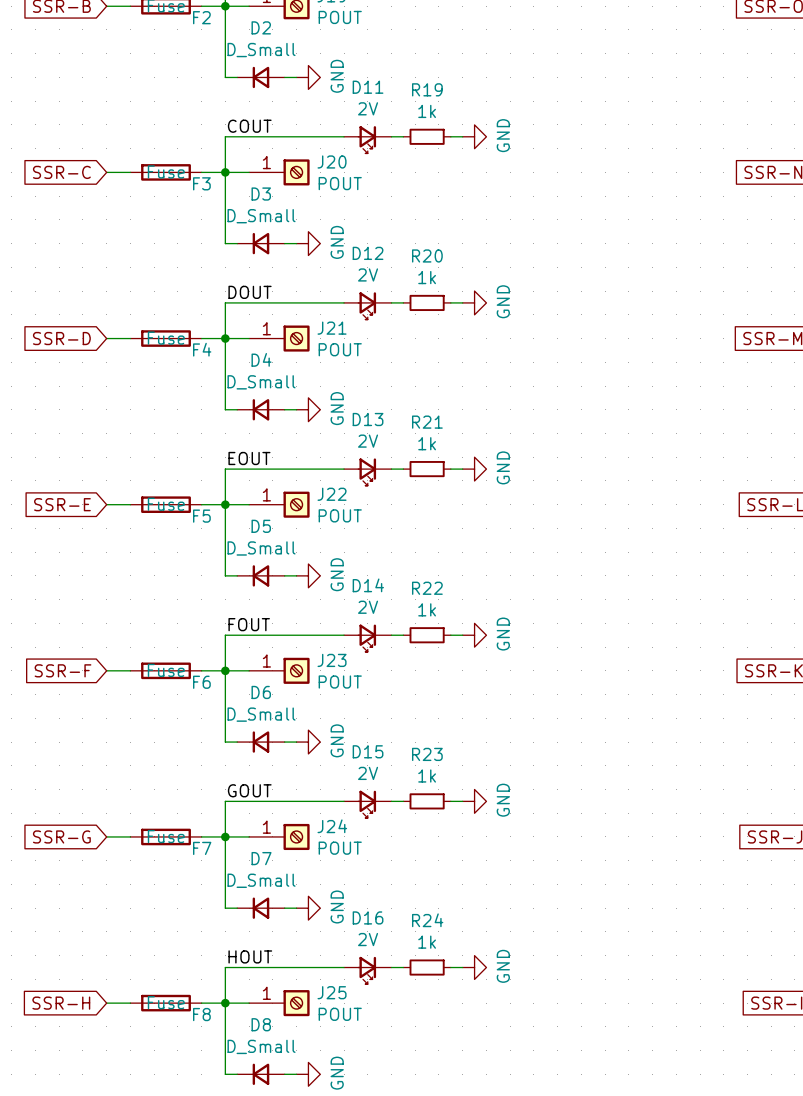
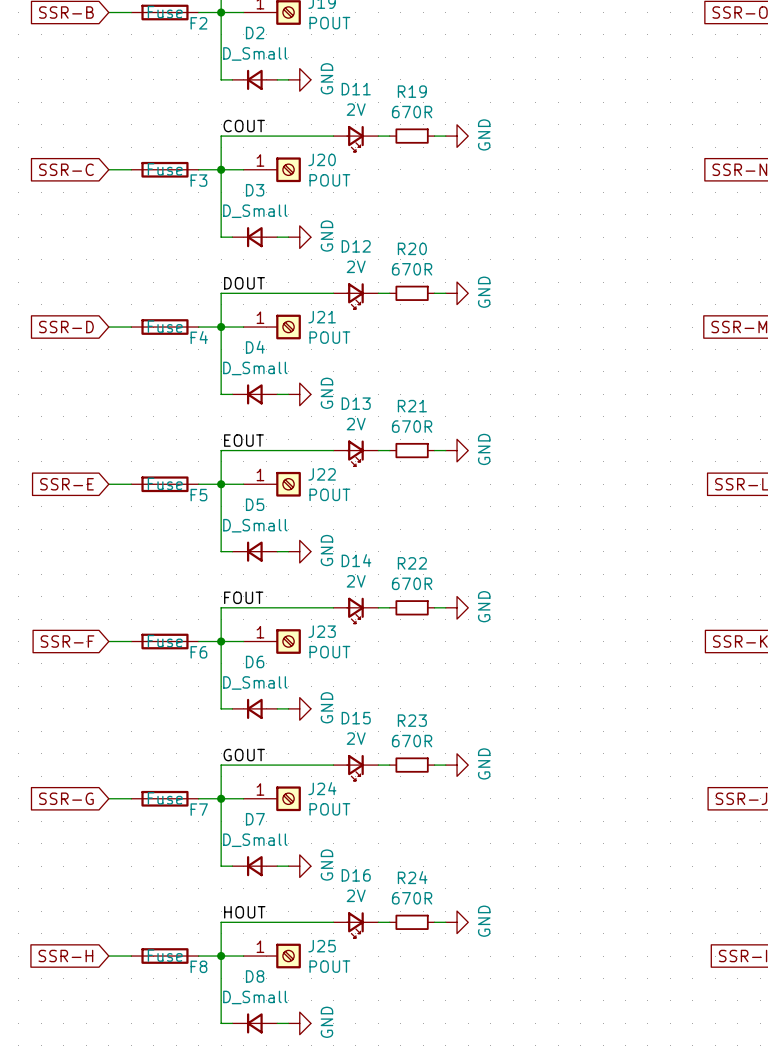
R19 value: 1k (427, 111) -> 670R (412, 112)
R20 value: 1k (427, 277) -> 670R (412, 269)
R21 value: 1k (427, 443) -> 670R (412, 426)
R22 value: 1k (427, 609) -> 670R (412, 583)
R23 value: 1k (427, 776) -> 670R (412, 741)
R24 value: 1k (427, 942) -> 670R (412, 898)

